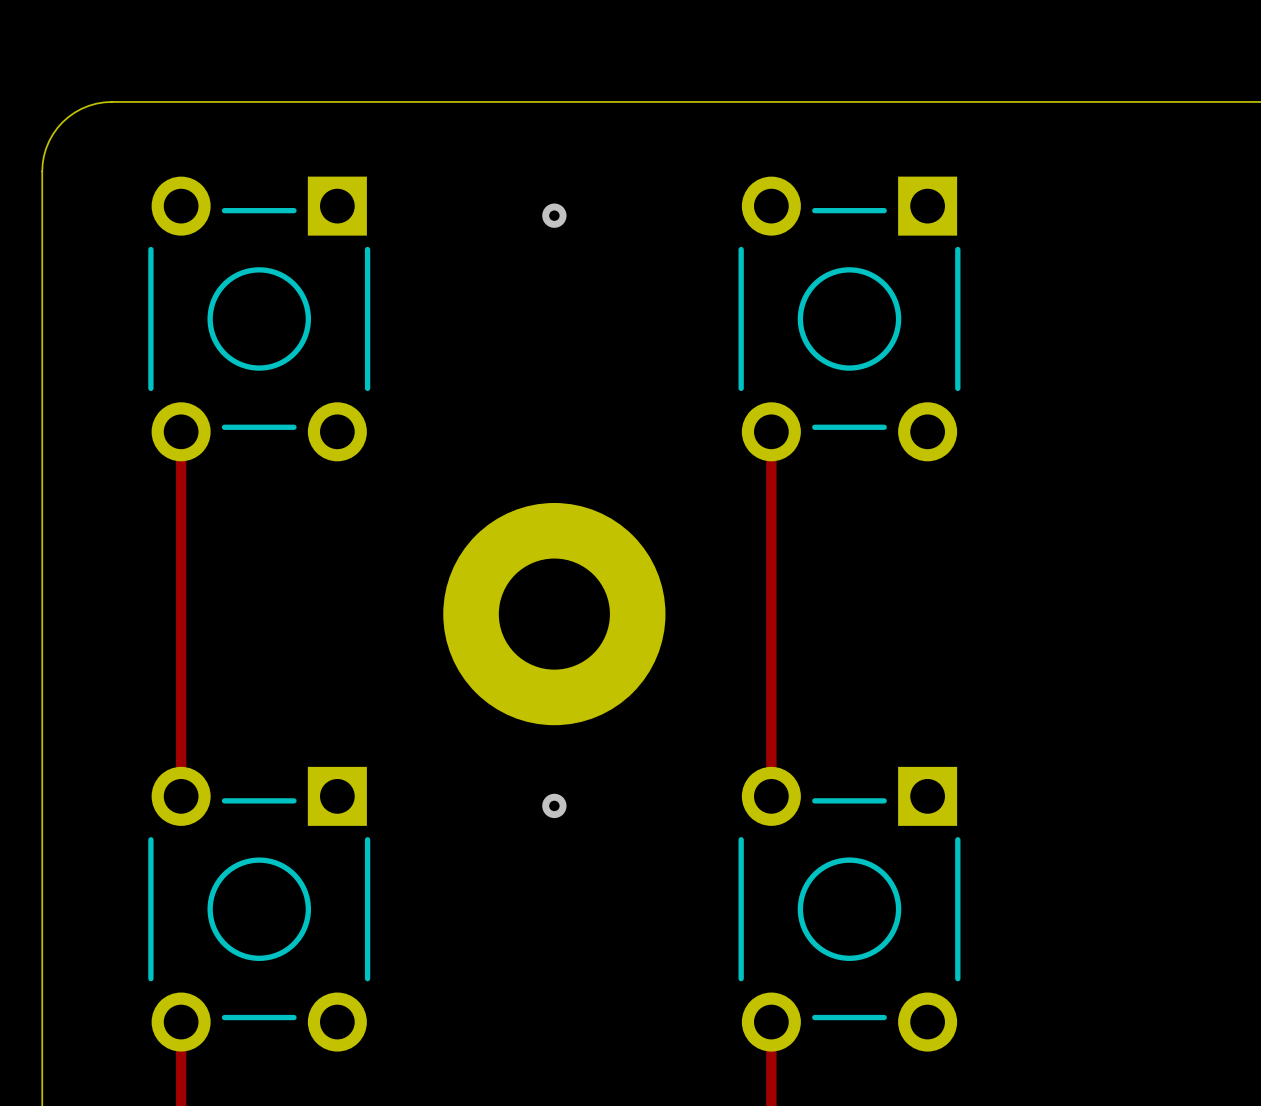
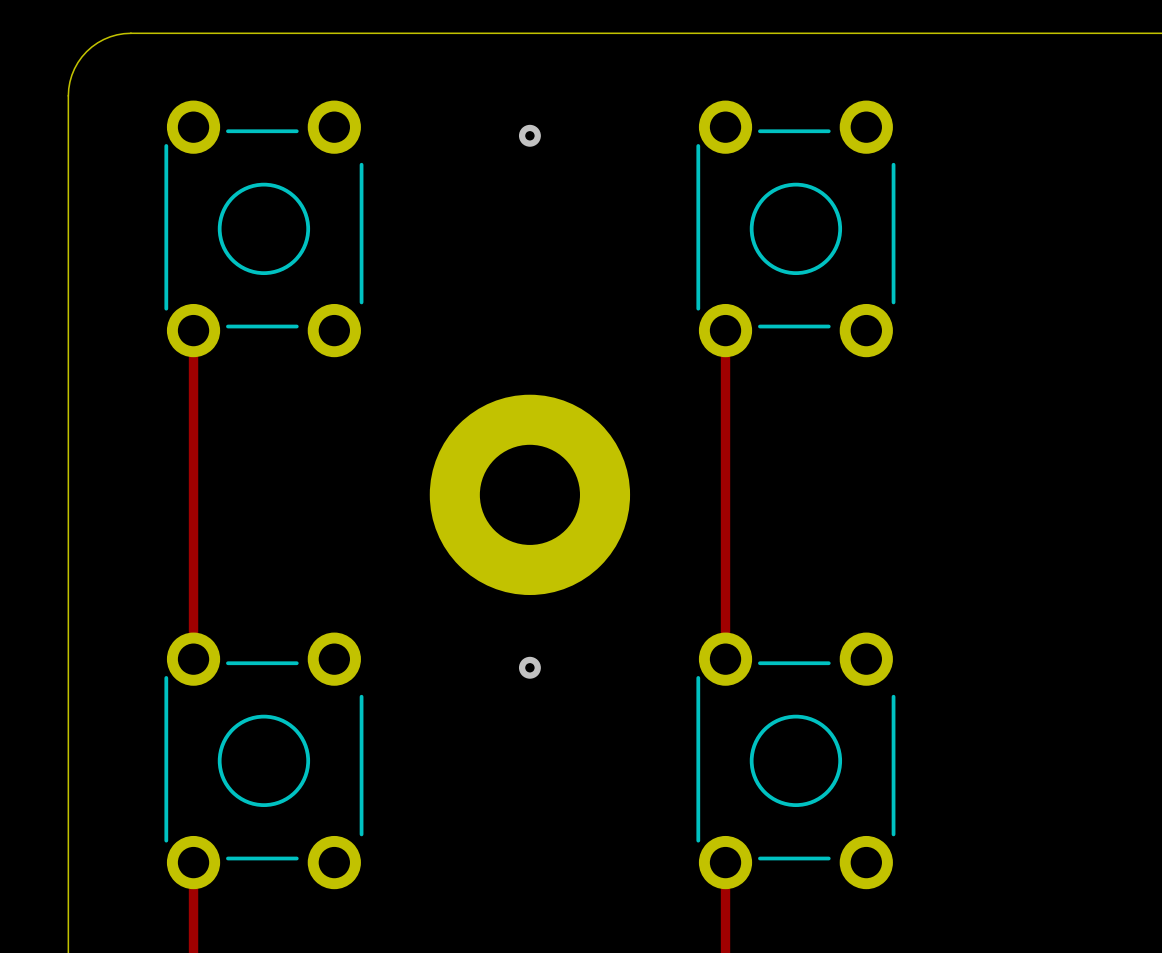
part footprint: [148, 176, 371, 462] -> [164, 100, 364, 358]
part footprint: [738, 176, 961, 462] -> [696, 100, 896, 358]
part footprint: [148, 766, 371, 1052] -> [164, 632, 364, 890]
part footprint: [738, 766, 961, 1052] -> [696, 632, 896, 890]

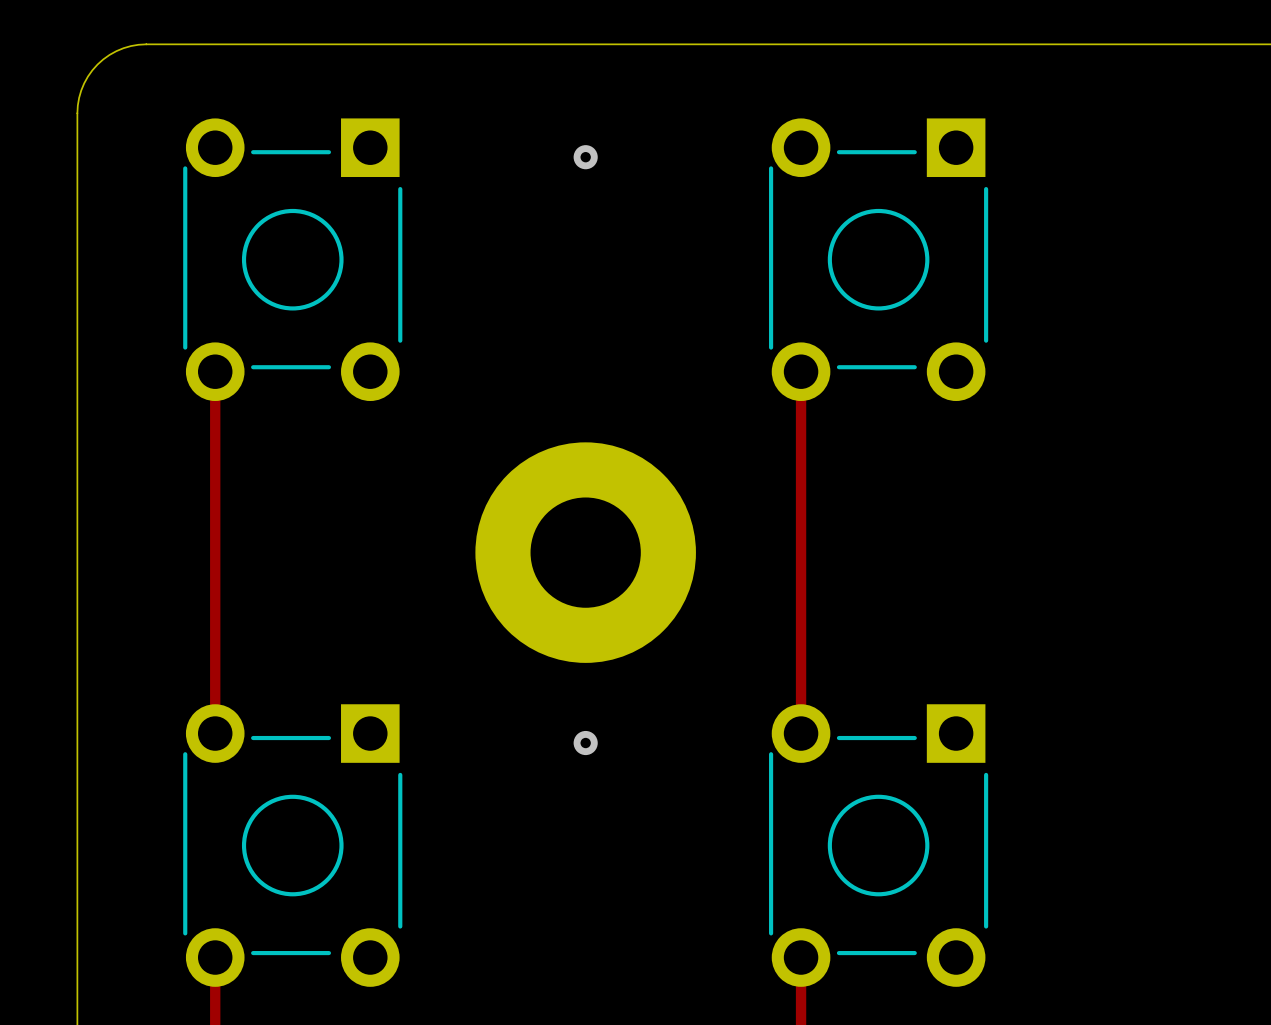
part footprint: [164, 100, 364, 358] -> [183, 118, 403, 402]
part footprint: [696, 100, 896, 358] -> [769, 118, 989, 402]
part footprint: [164, 632, 364, 890] -> [183, 704, 403, 987]
part footprint: [696, 632, 896, 890] -> [769, 704, 989, 987]

